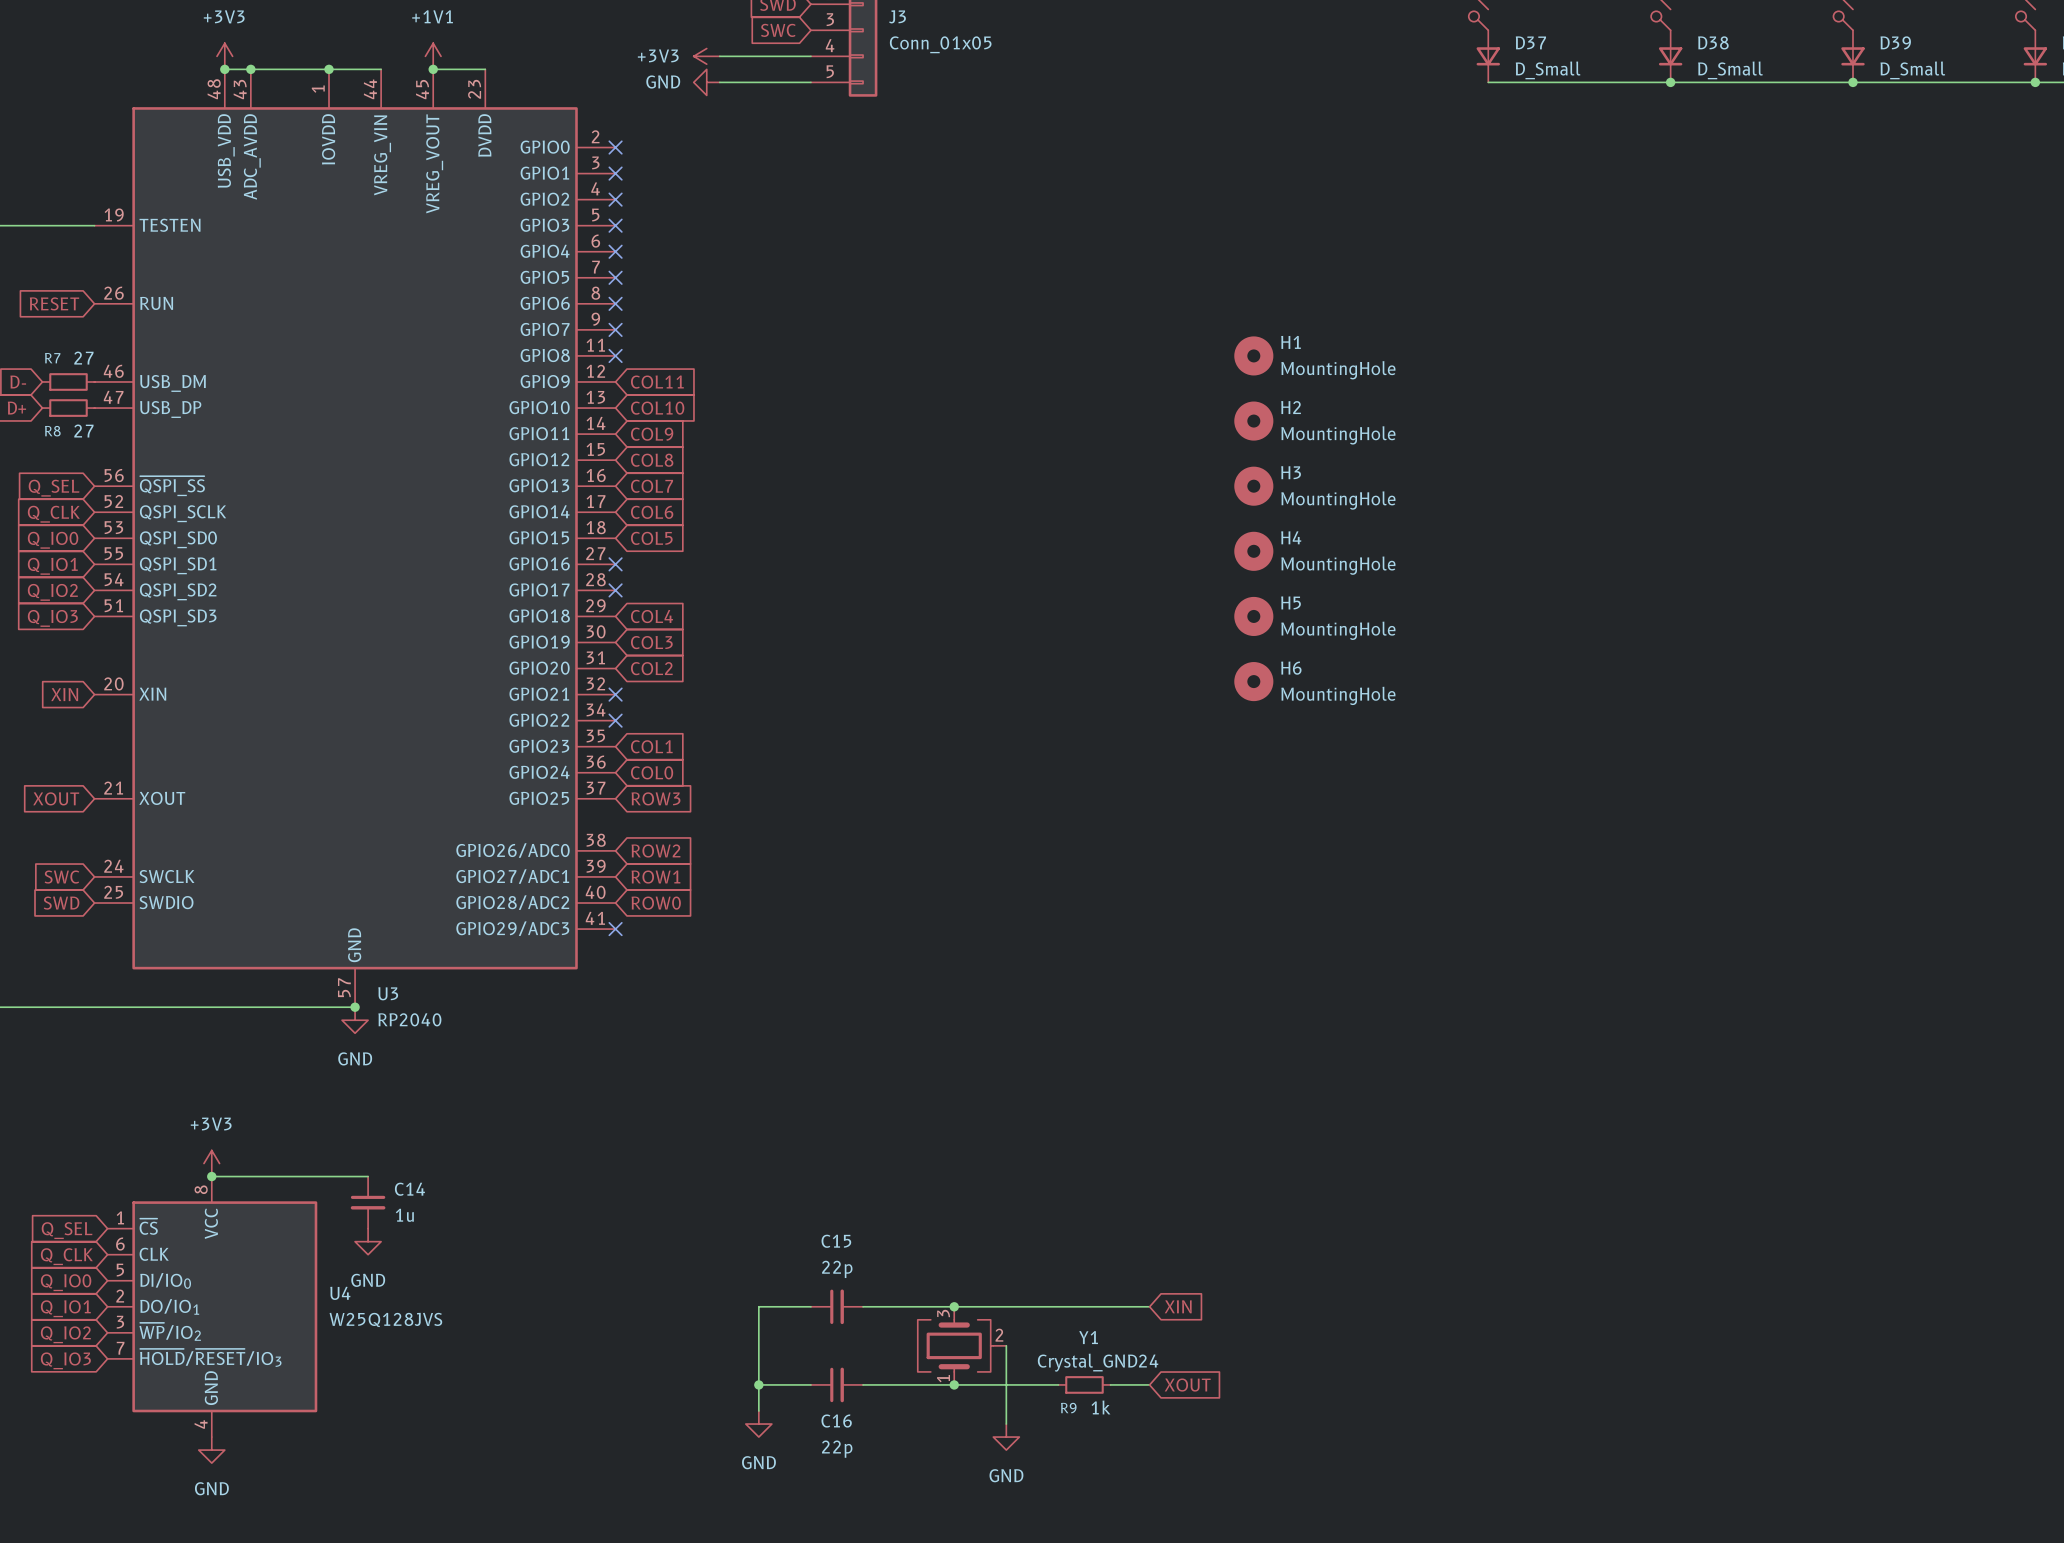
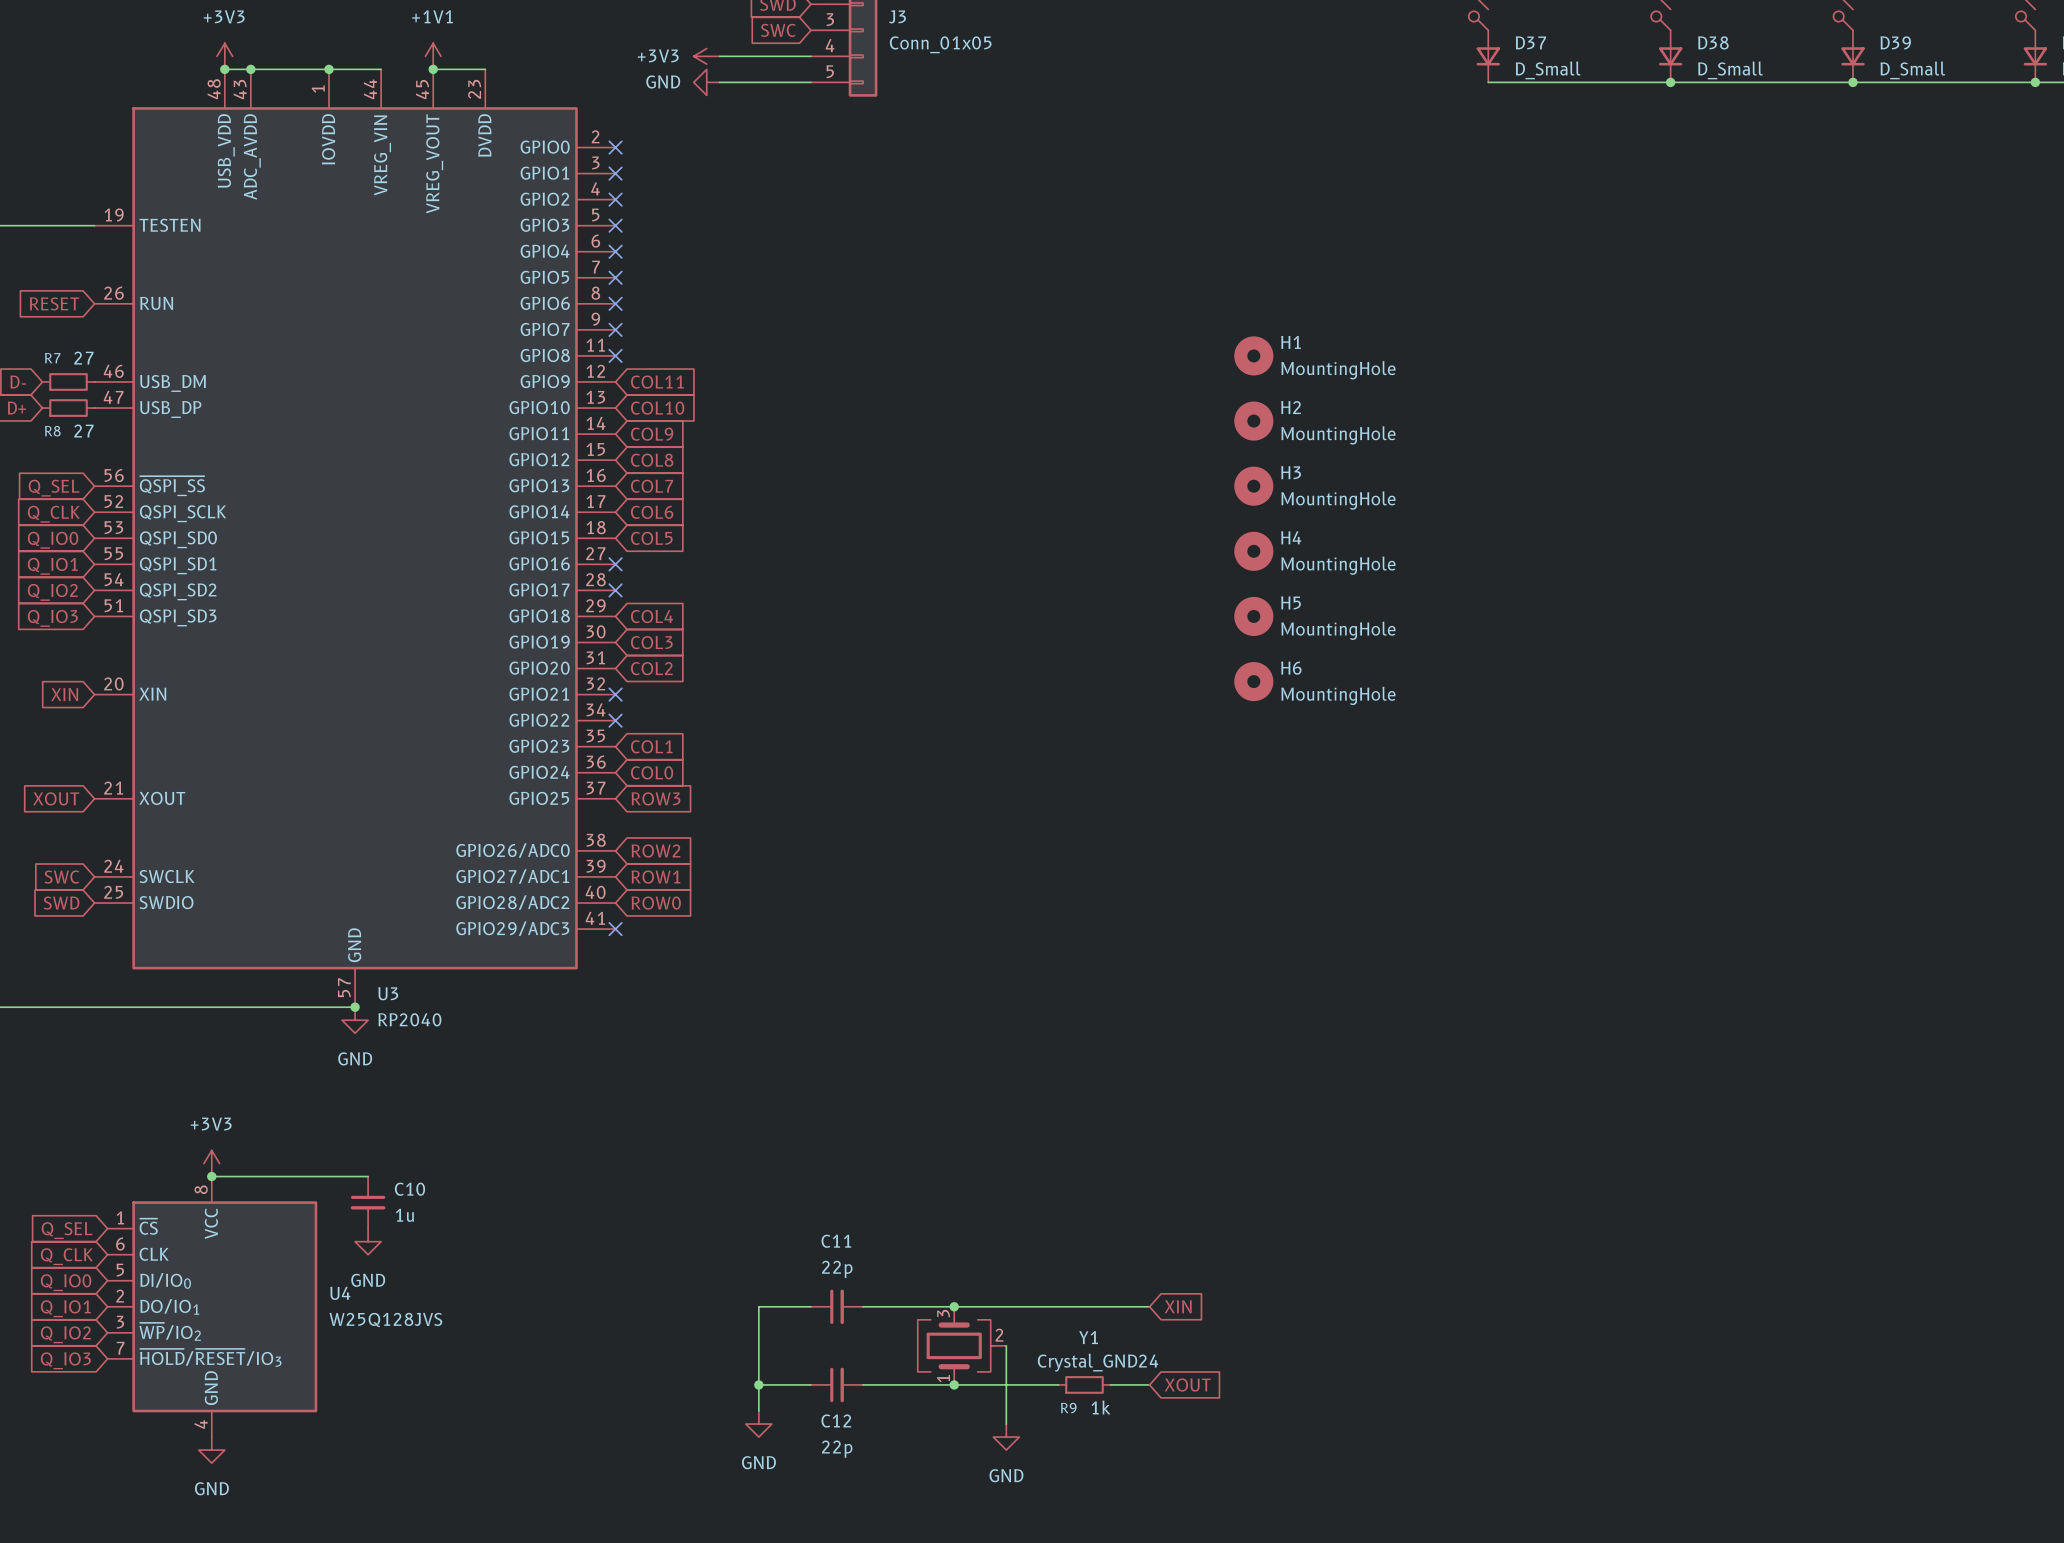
C14 name: C14 (409, 1189) -> C10 (409, 1189)
C15 name: C15 (836, 1241) -> C11 (836, 1241)
C16 name: C16 (836, 1421) -> C12 (836, 1421)

